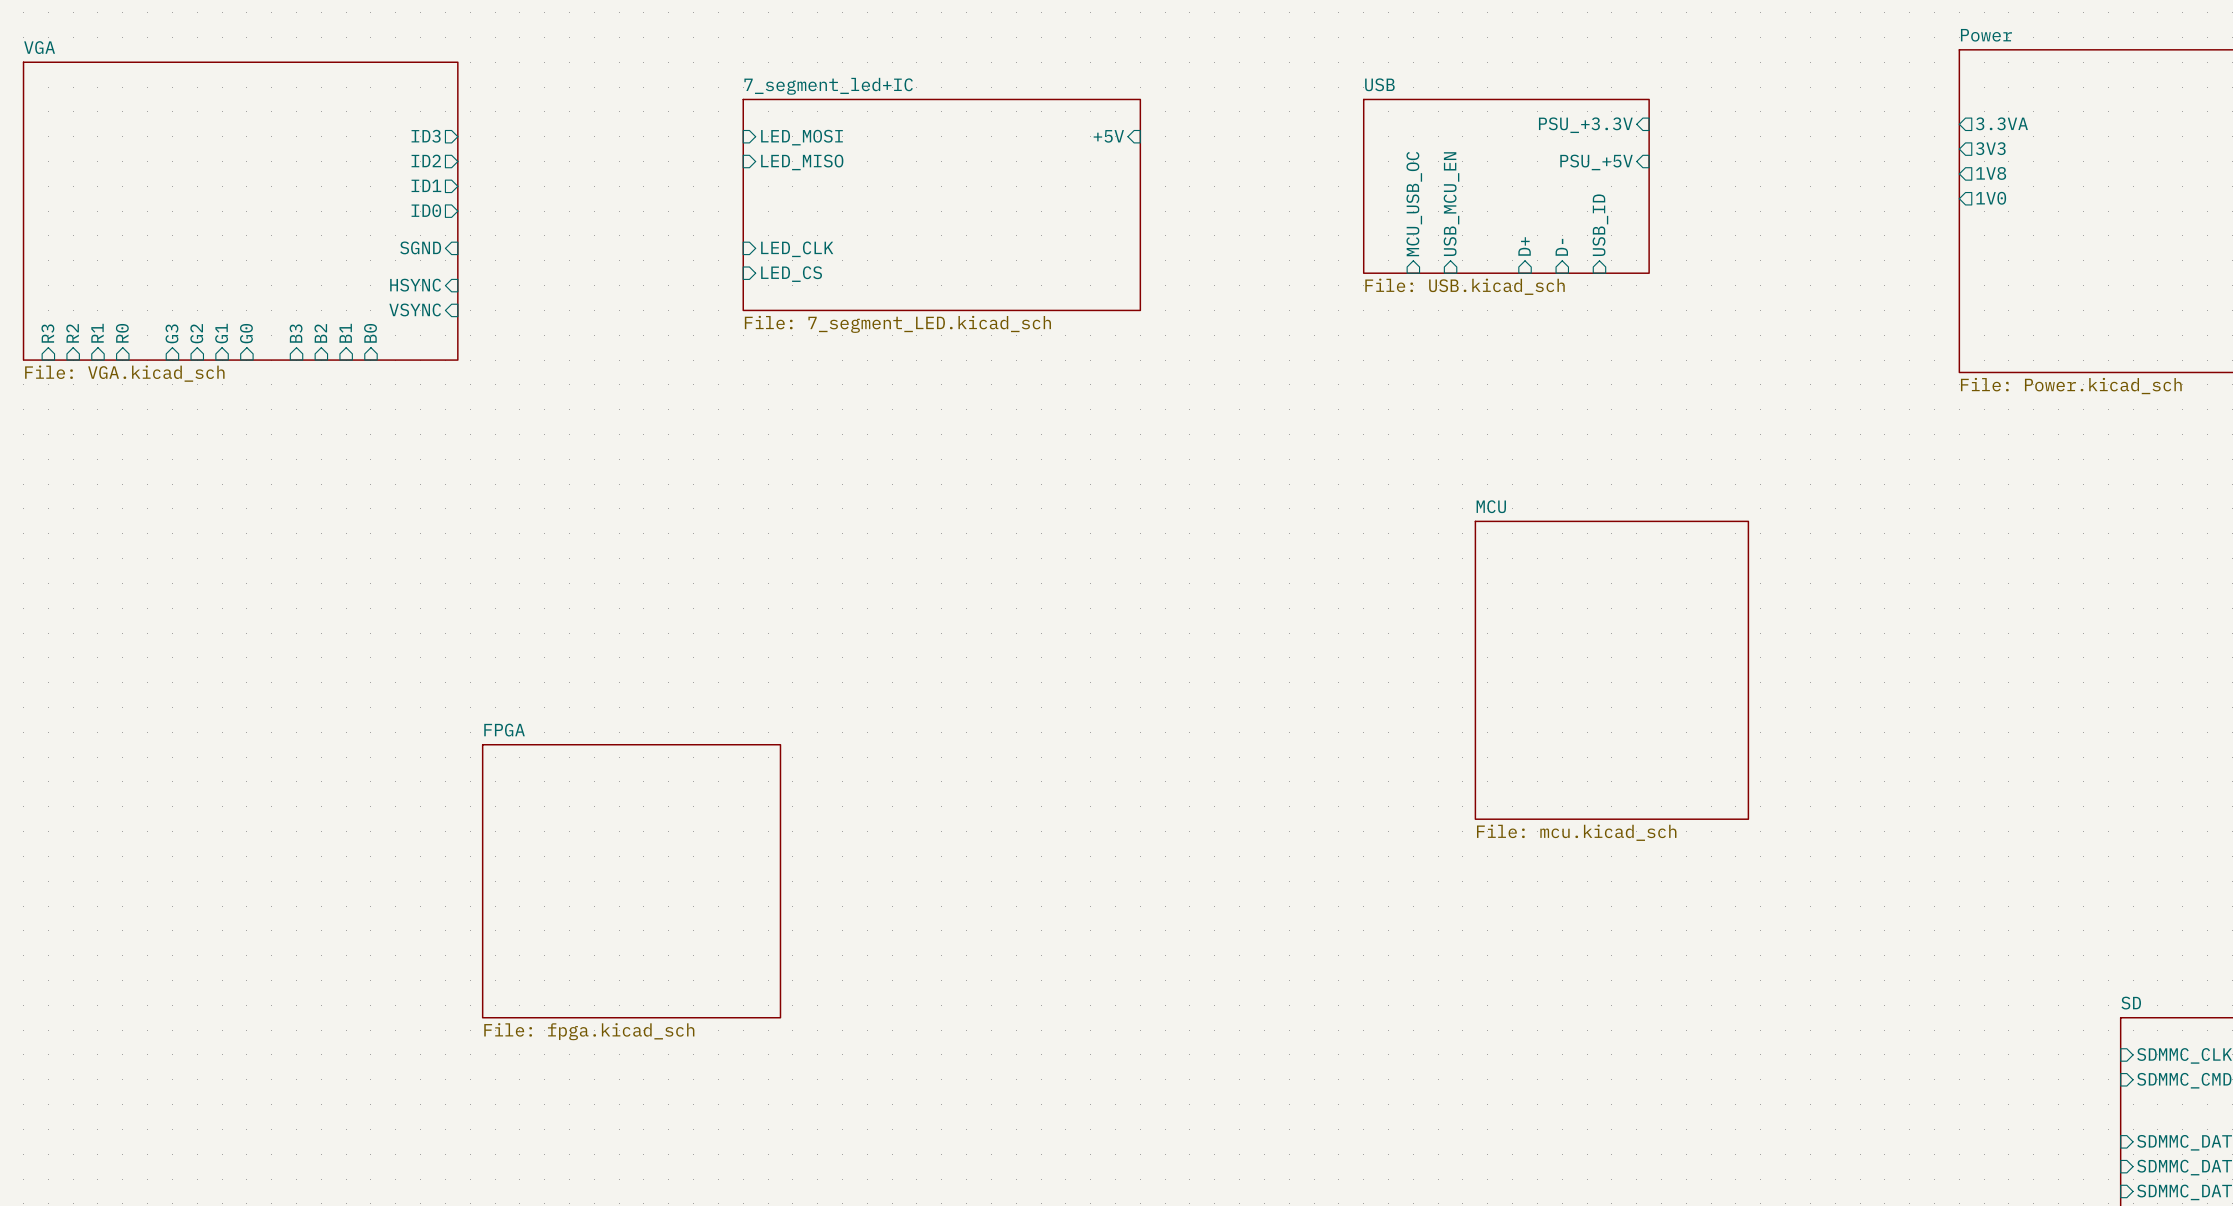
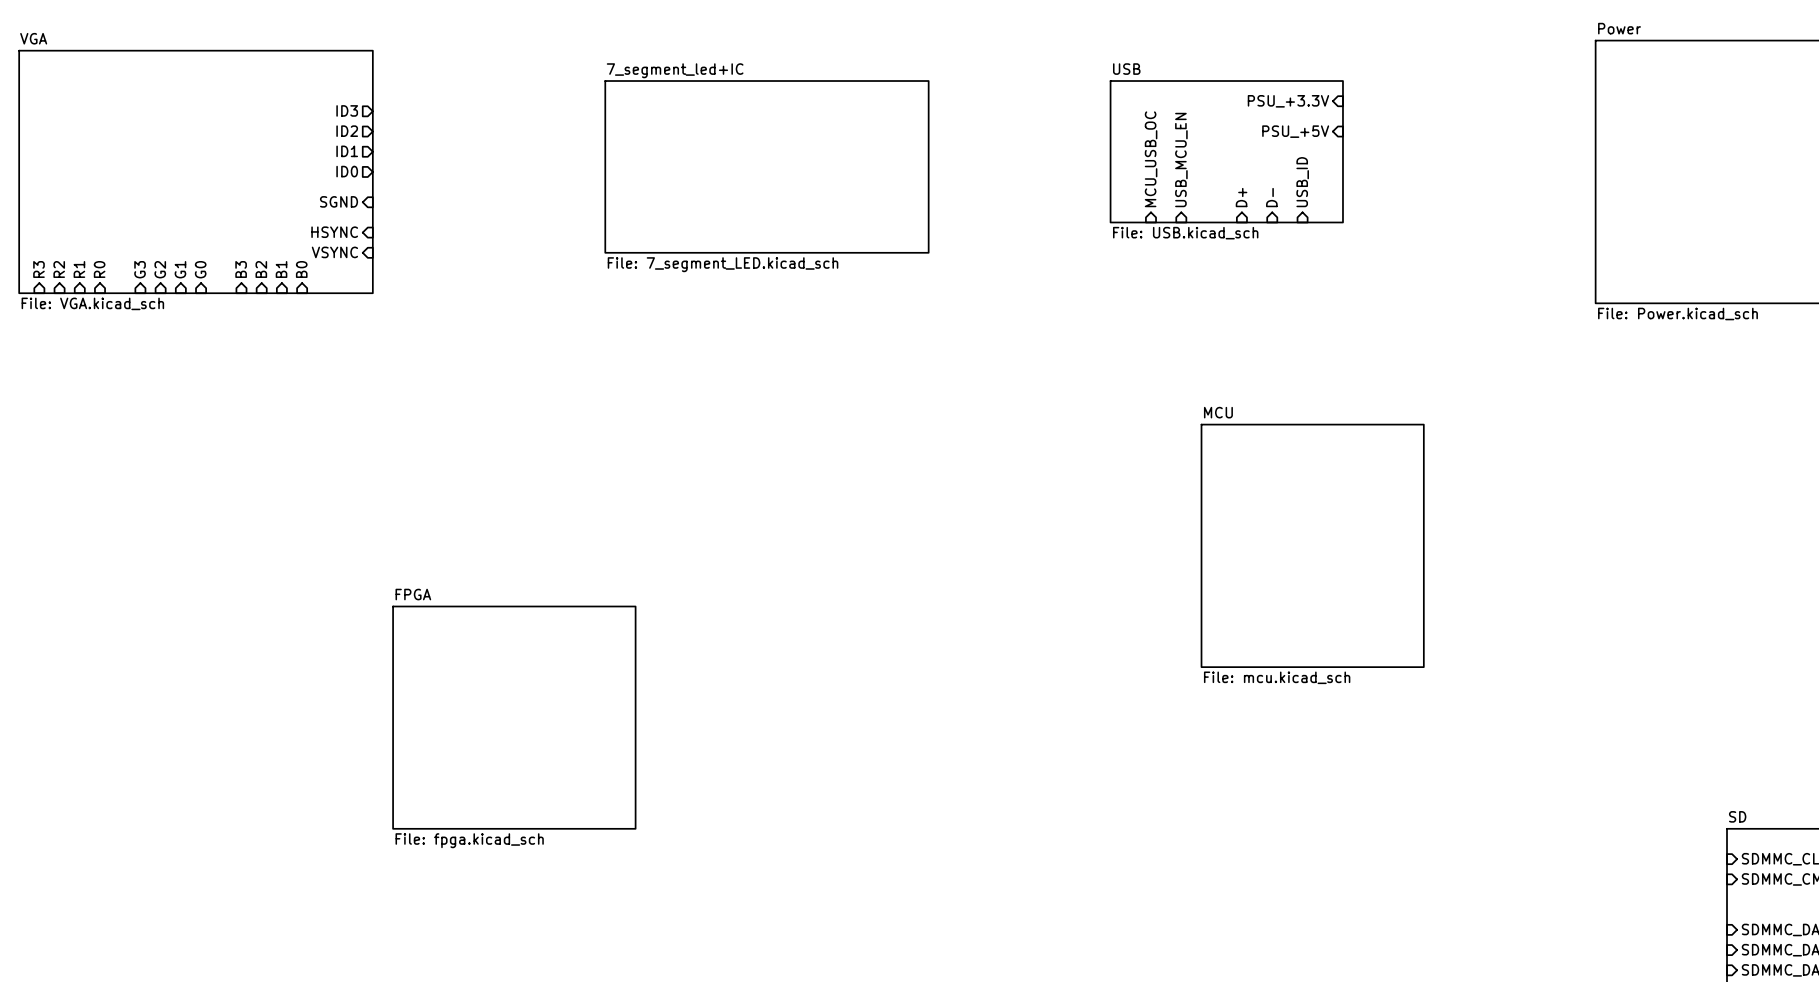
sheet pin: 3.3VA (2001, 123) -> none
sheet pin: +5V (1108, 136) -> none
sheet pin: LED_MOSI (802, 137) -> none
sheet pin: 3V3 (1990, 148) -> none
sheet pin: LED_MISO (802, 162) -> none
sheet pin: 1V8 (1991, 173) -> none
sheet pin: 1V0 (1991, 198) -> none
sheet pin: LED_CLK (797, 249) -> none
sheet pin: LED_CS (791, 274) -> none

